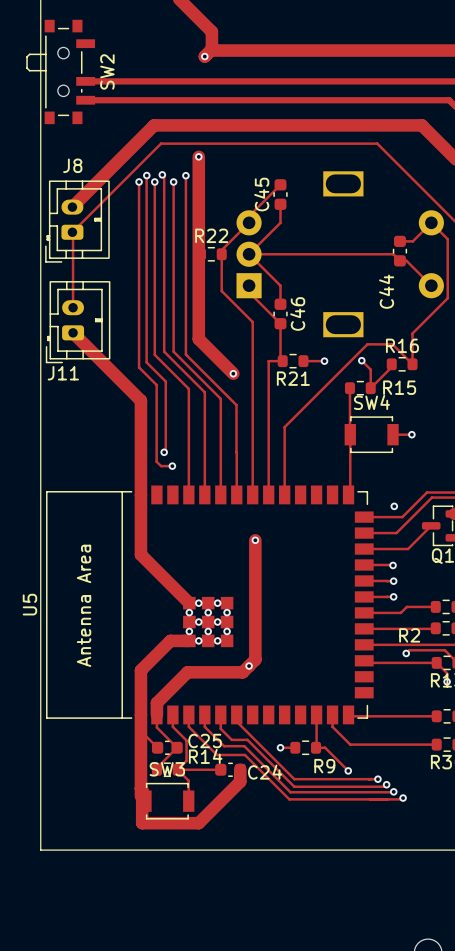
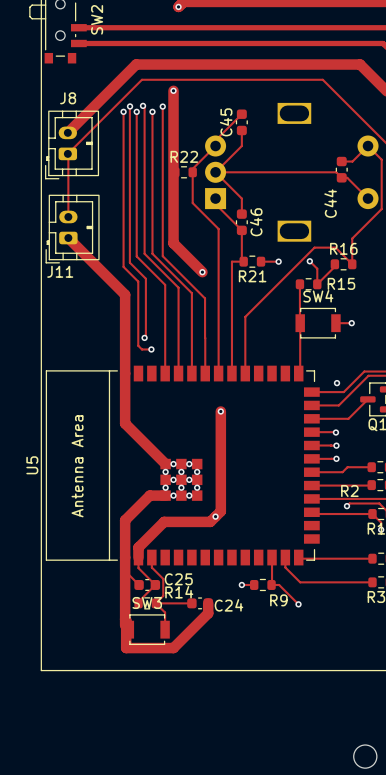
track: (188, 714) (188, 726) (216, 754) (244, 754) (289, 799) (403, 798) -> none
track: (204, 714) (204, 726) (224, 746) (244, 746) (290, 792) (393, 791) -> none
track: (220, 714) (220, 728) (231, 739) (247, 739) (294, 786) (384, 786) (386, 784) -> none
track: (236, 714) (236, 721) (294, 779) (377, 779) -> none
via: (377, 779) -> none
via: (386, 784) -> none
via: (393, 791) -> none
via: (403, 798) -> none

